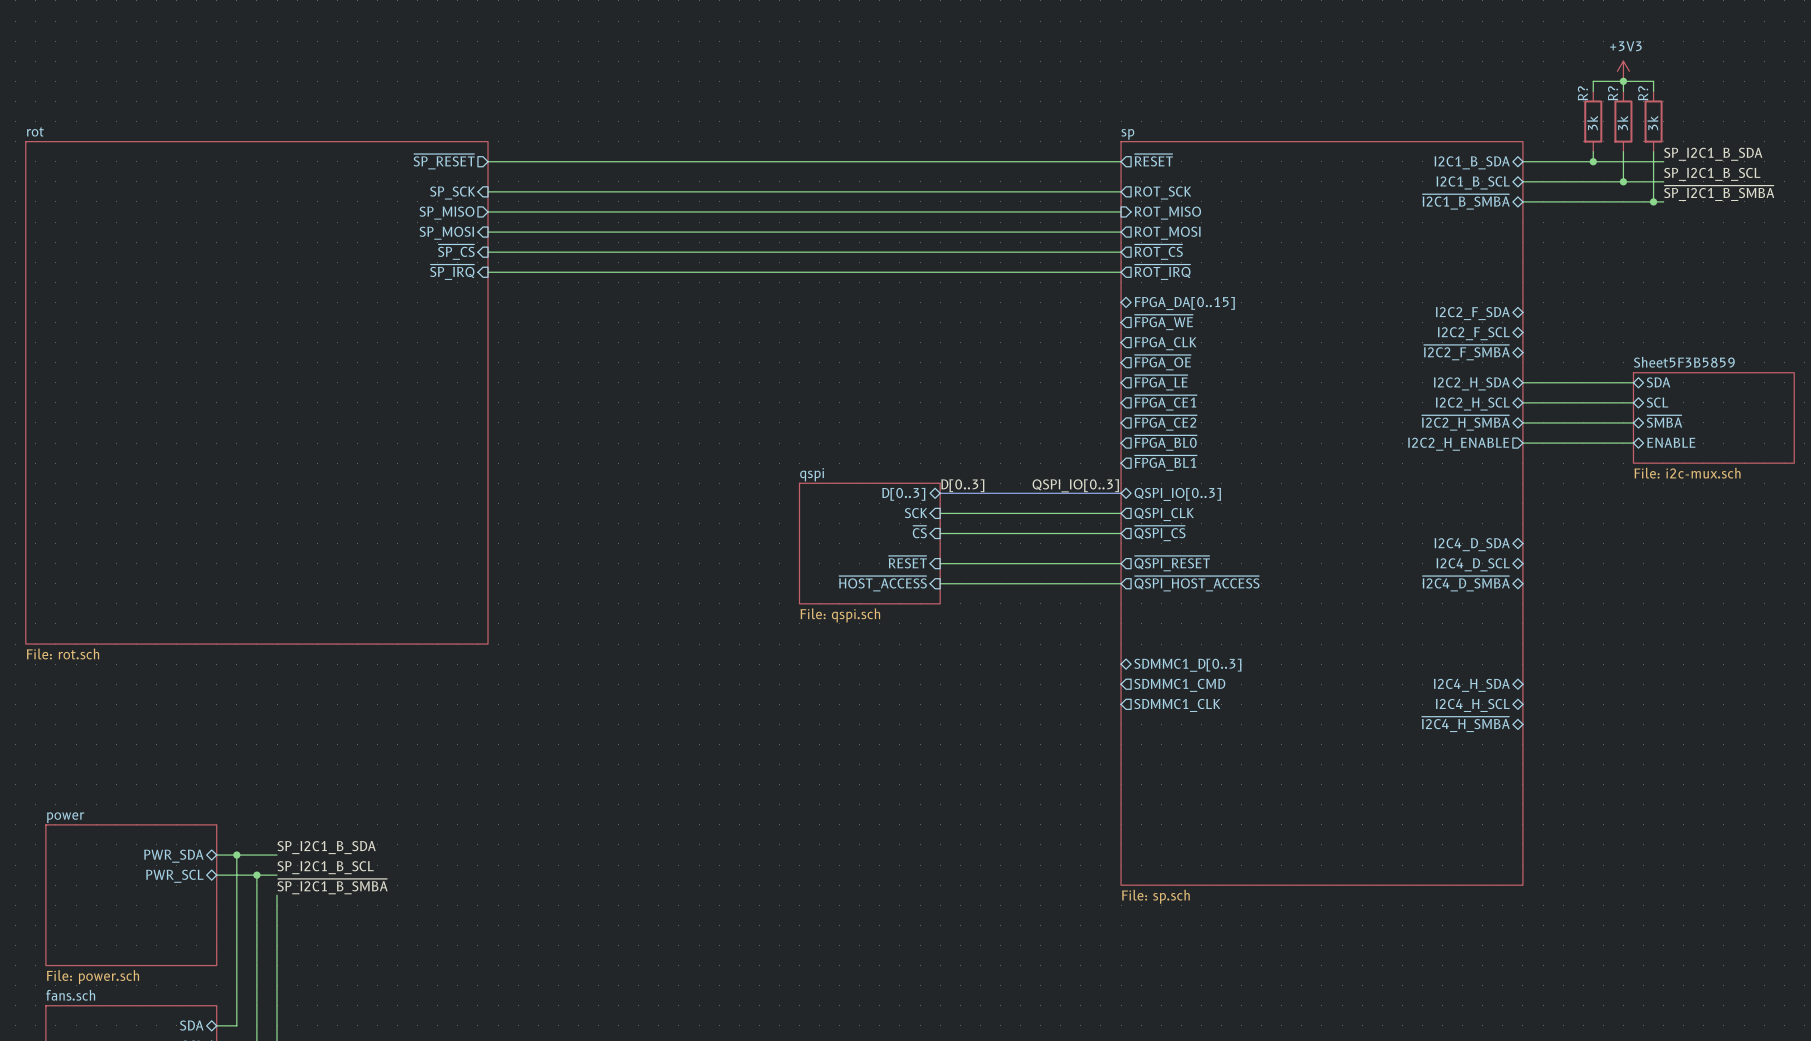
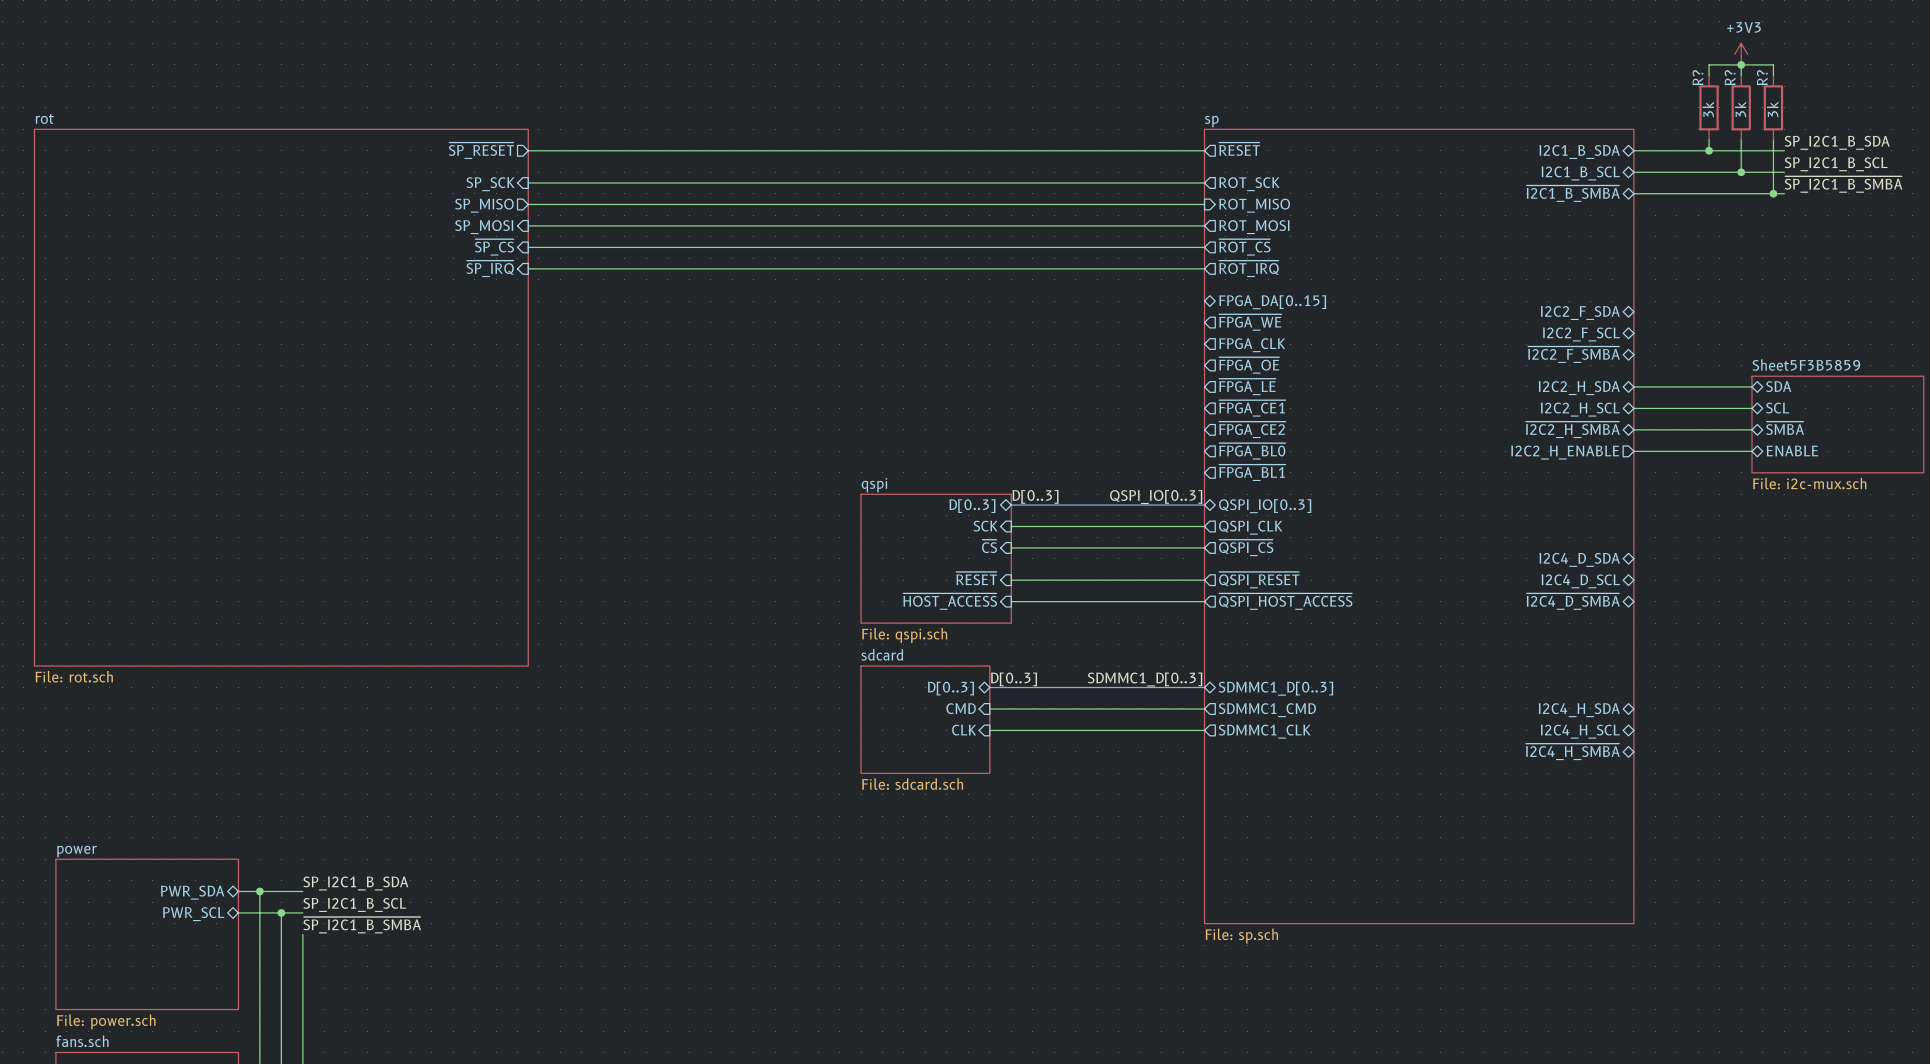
label: none -> D[0..3] (1014, 679)
label: none -> SDMMC1_D[0..3] (1145, 679)
bus: none -> (989, 687) (1204, 687)
sheet pin: none -> D[0..3] (951, 688)
sheet pin: none -> CMD (961, 708)
wire: none -> (989, 708) (1204, 708)
sheet sdcard: none -> File: sdcard.sch (925, 719)
sheet pin: none -> CLK (964, 730)
wire: none -> (989, 730) (1204, 730)

